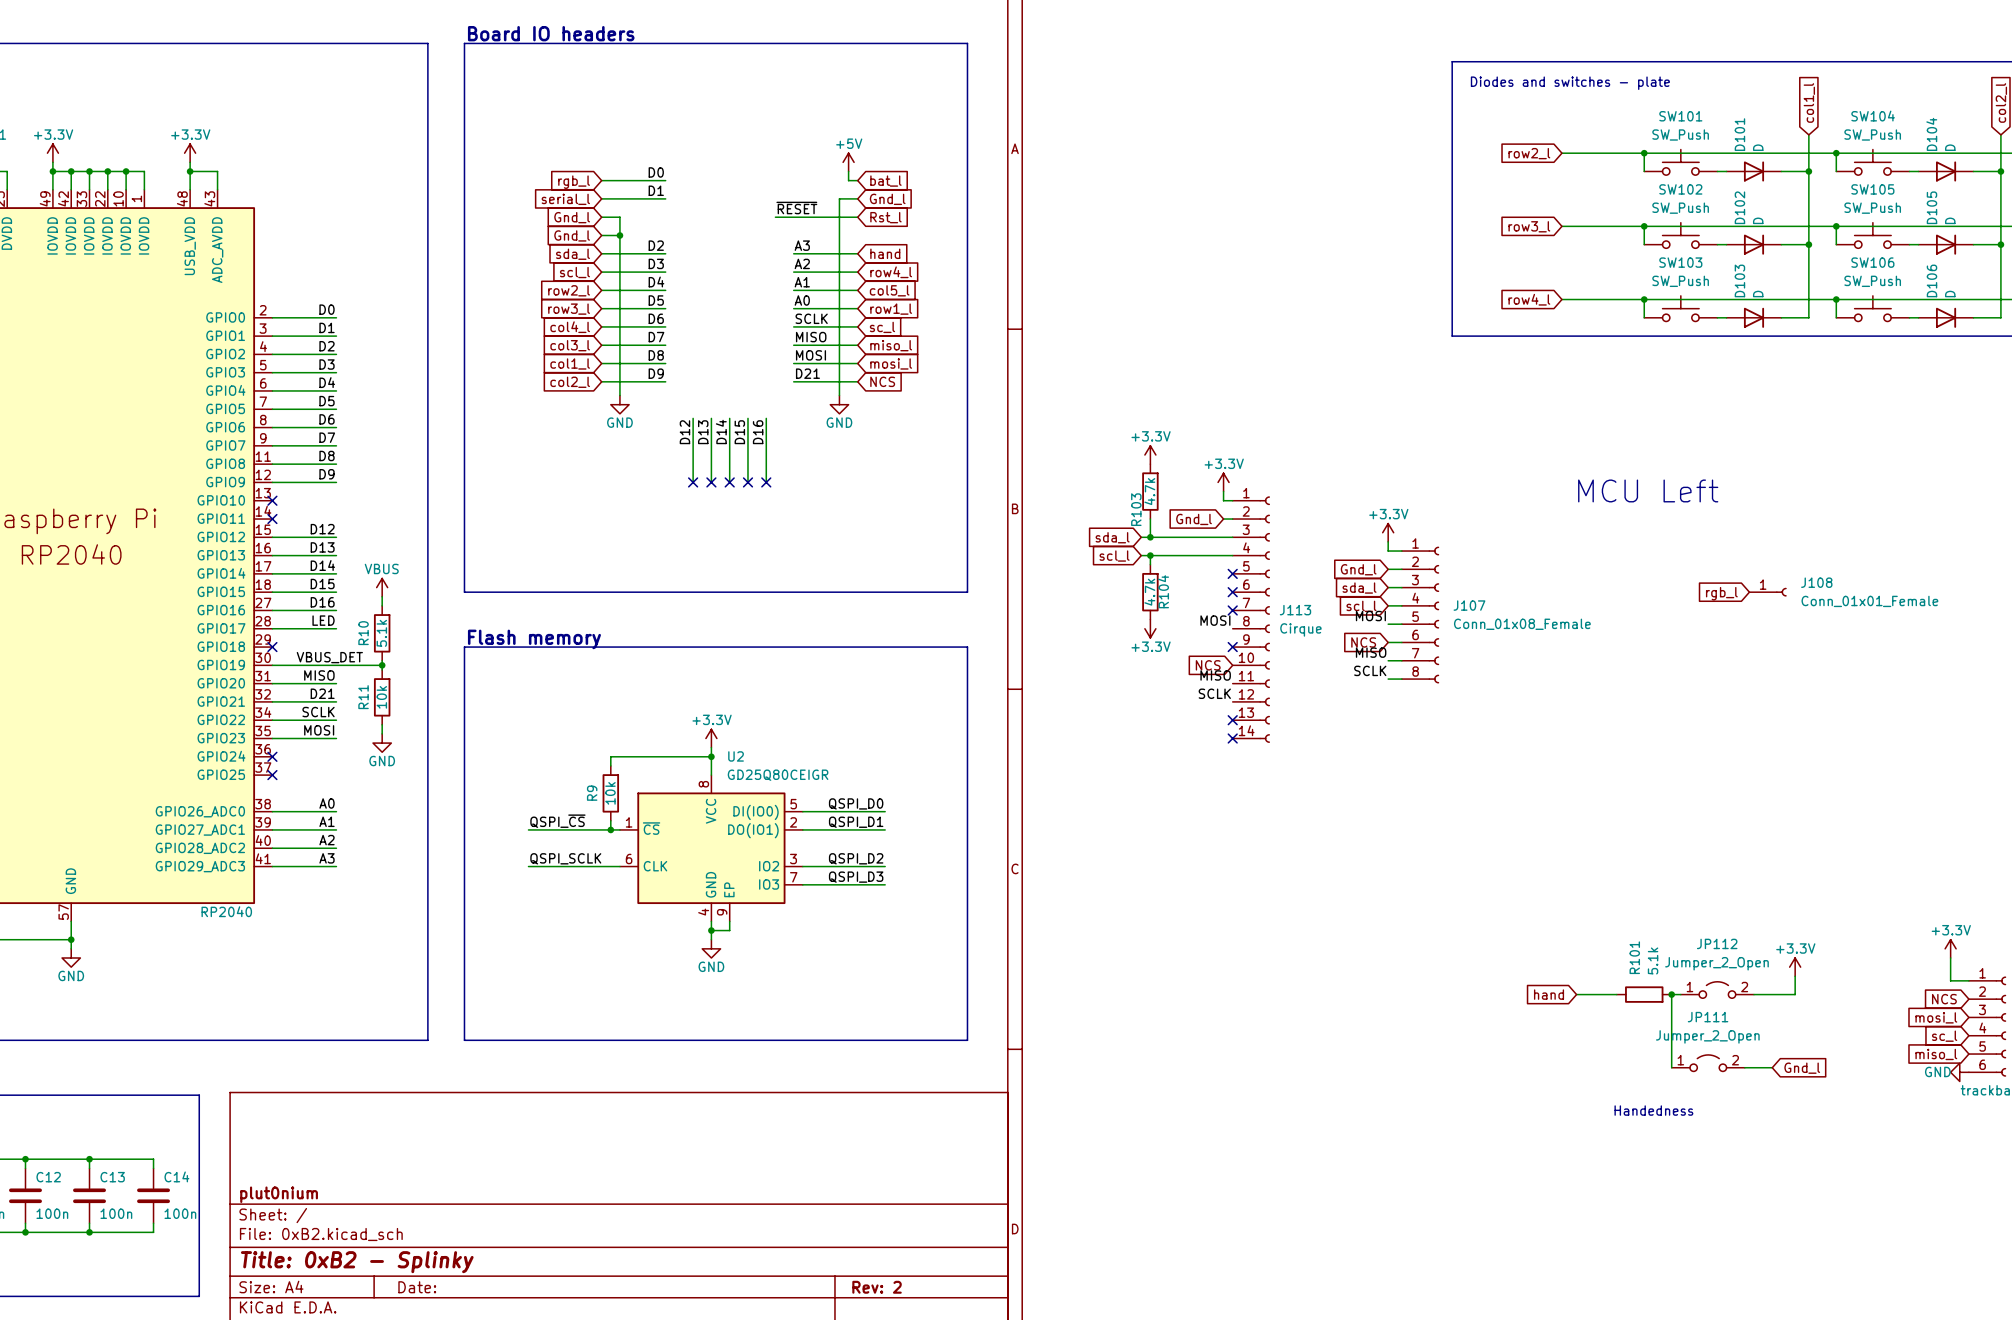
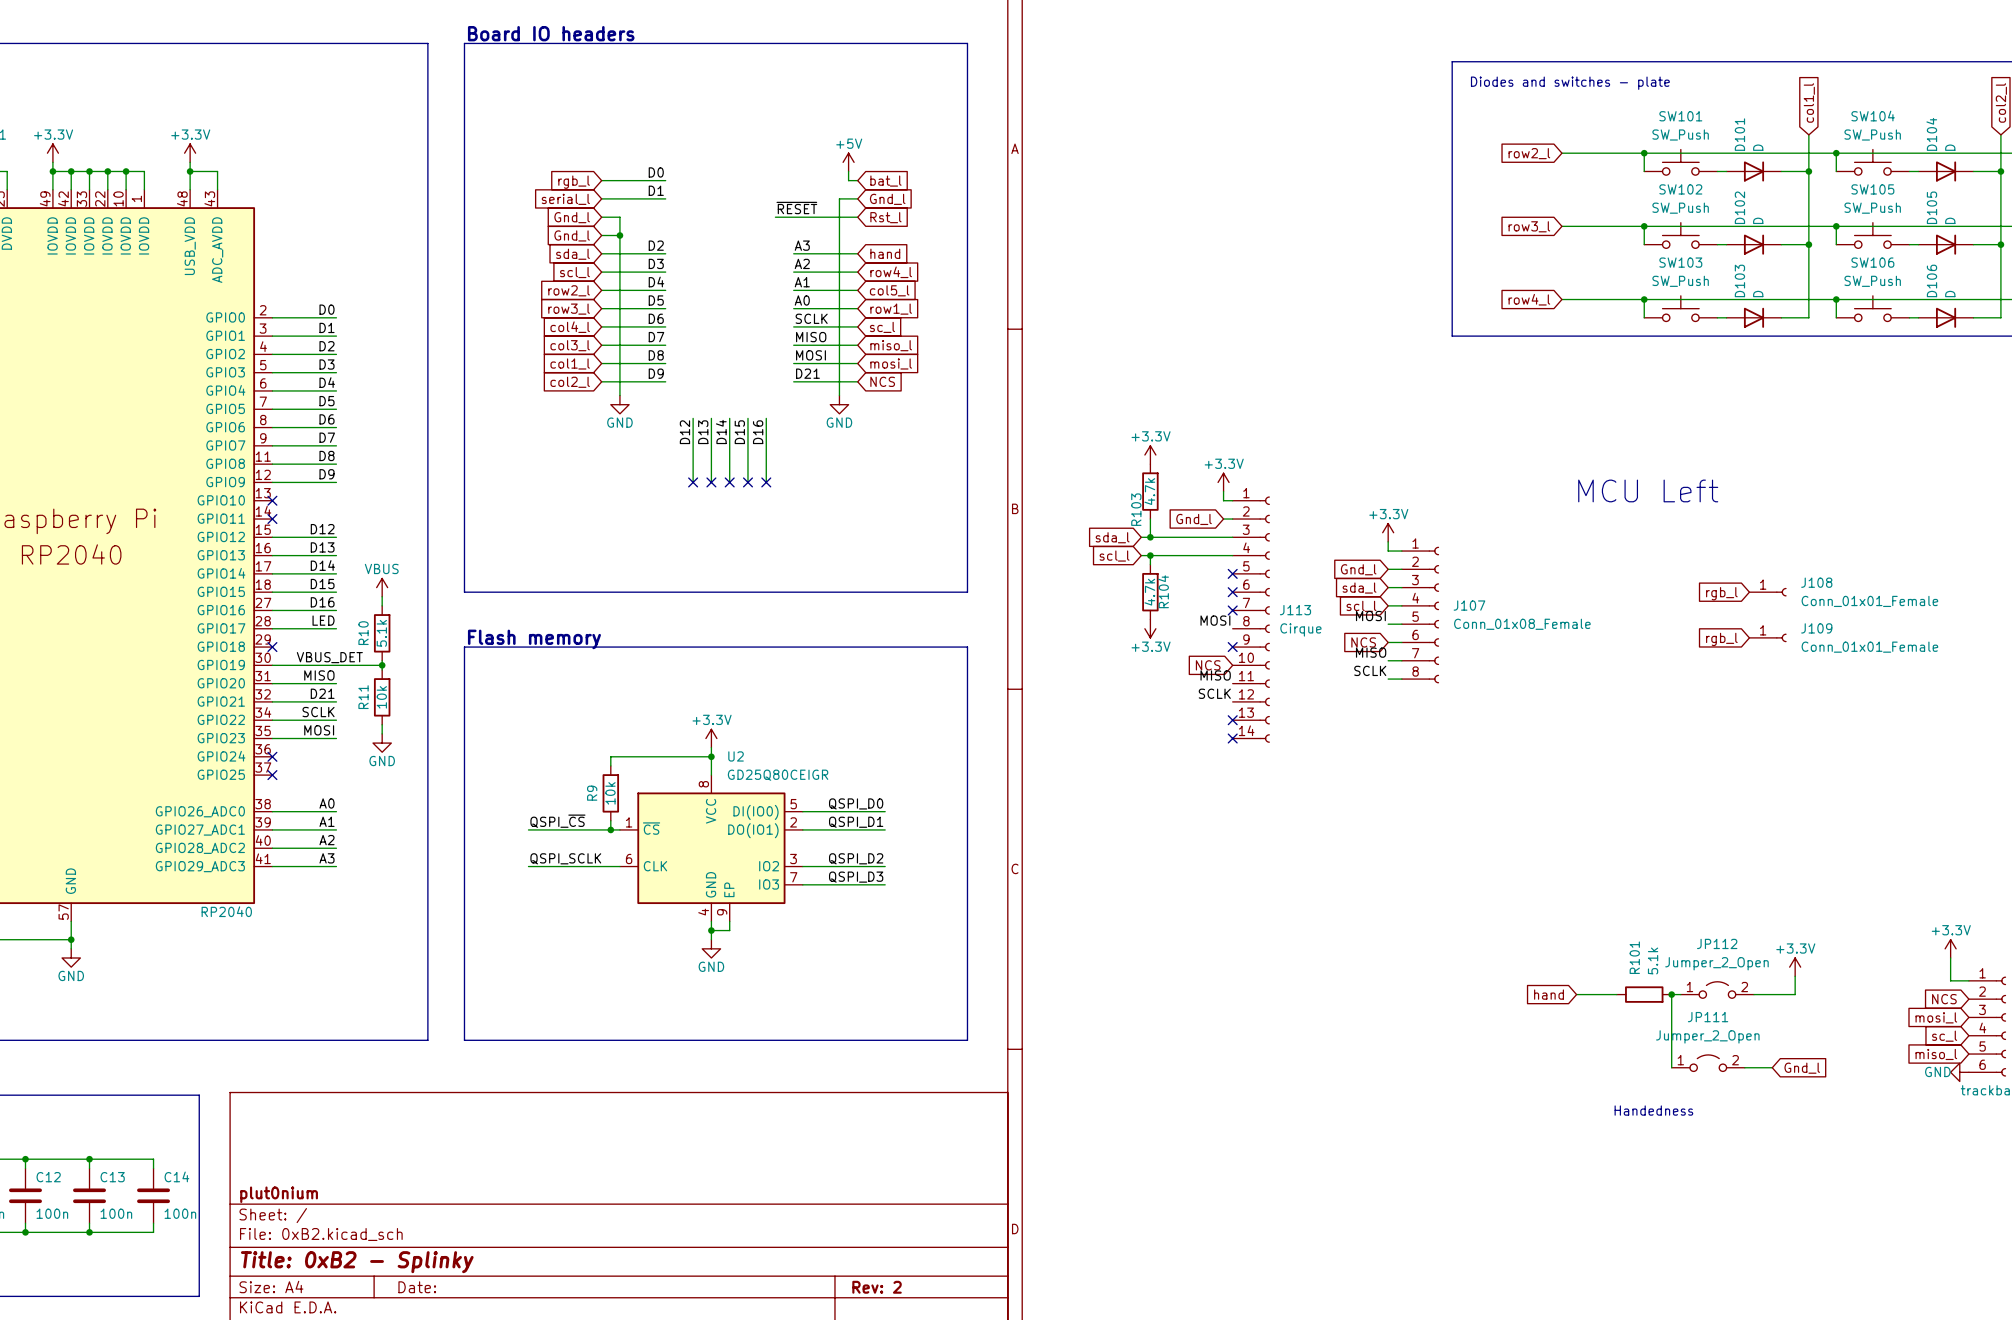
J109: none -> Conn_01x01_Female (1767, 637)
global label: none -> rgb_l (1721, 639)

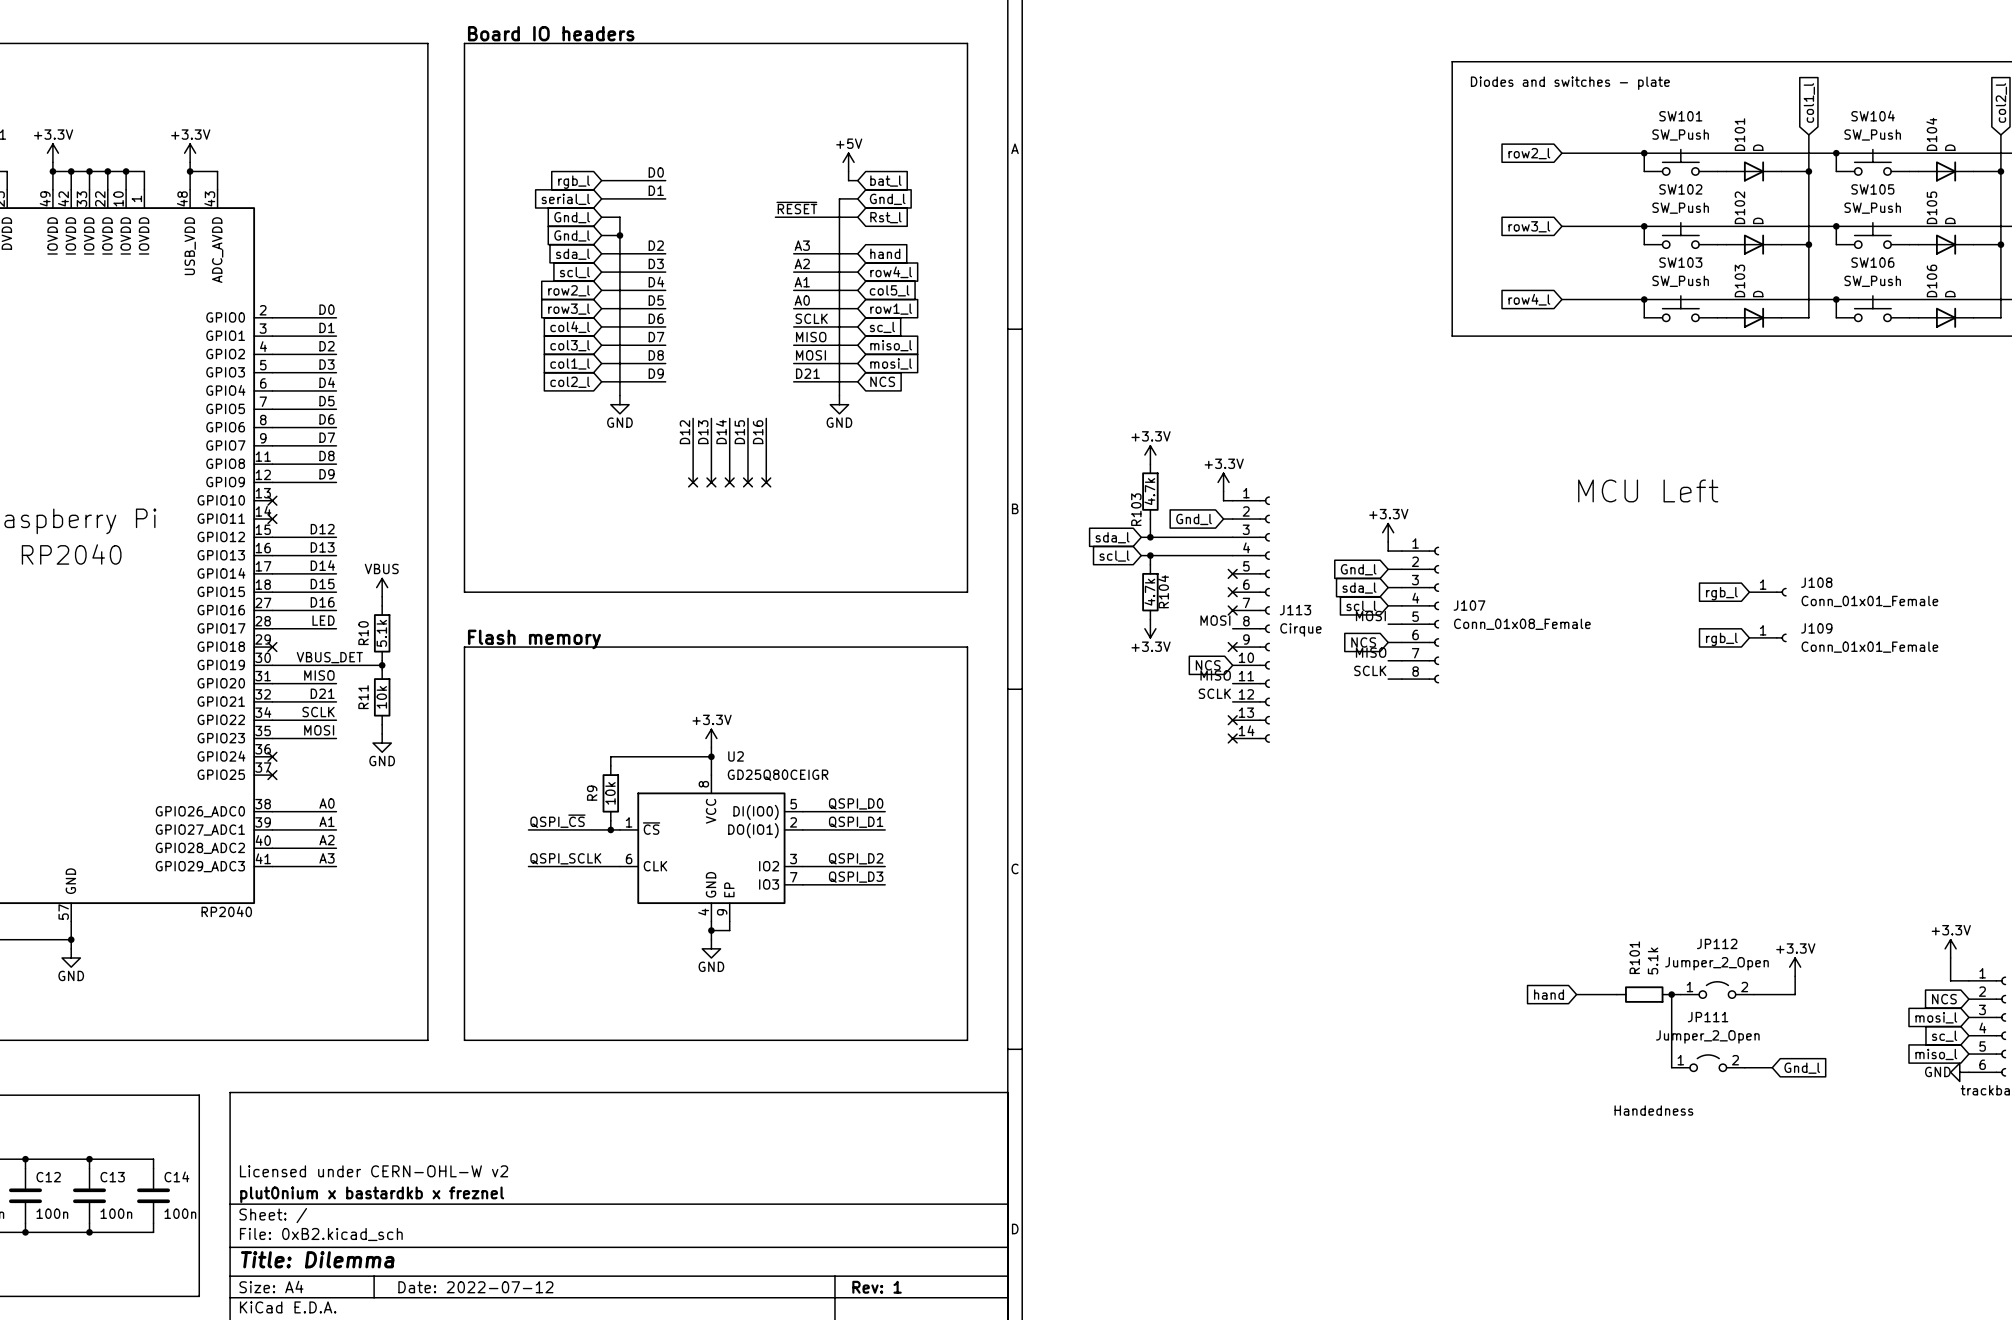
title block: none -> Licensed under CERN-OHL-W v2 (374, 1171)
title block: plut0nium (279, 1194) -> plut0nium x bastardkb x freznel (372, 1194)
title block: Title: 0xB2 - Splinky (357, 1262) -> Title: Dilemma (317, 1259)
title block: Date: (417, 1287) -> Date: 2022-07-12 (475, 1287)
title block: Rev: 2 (877, 1287) -> Rev: 1 (877, 1287)

